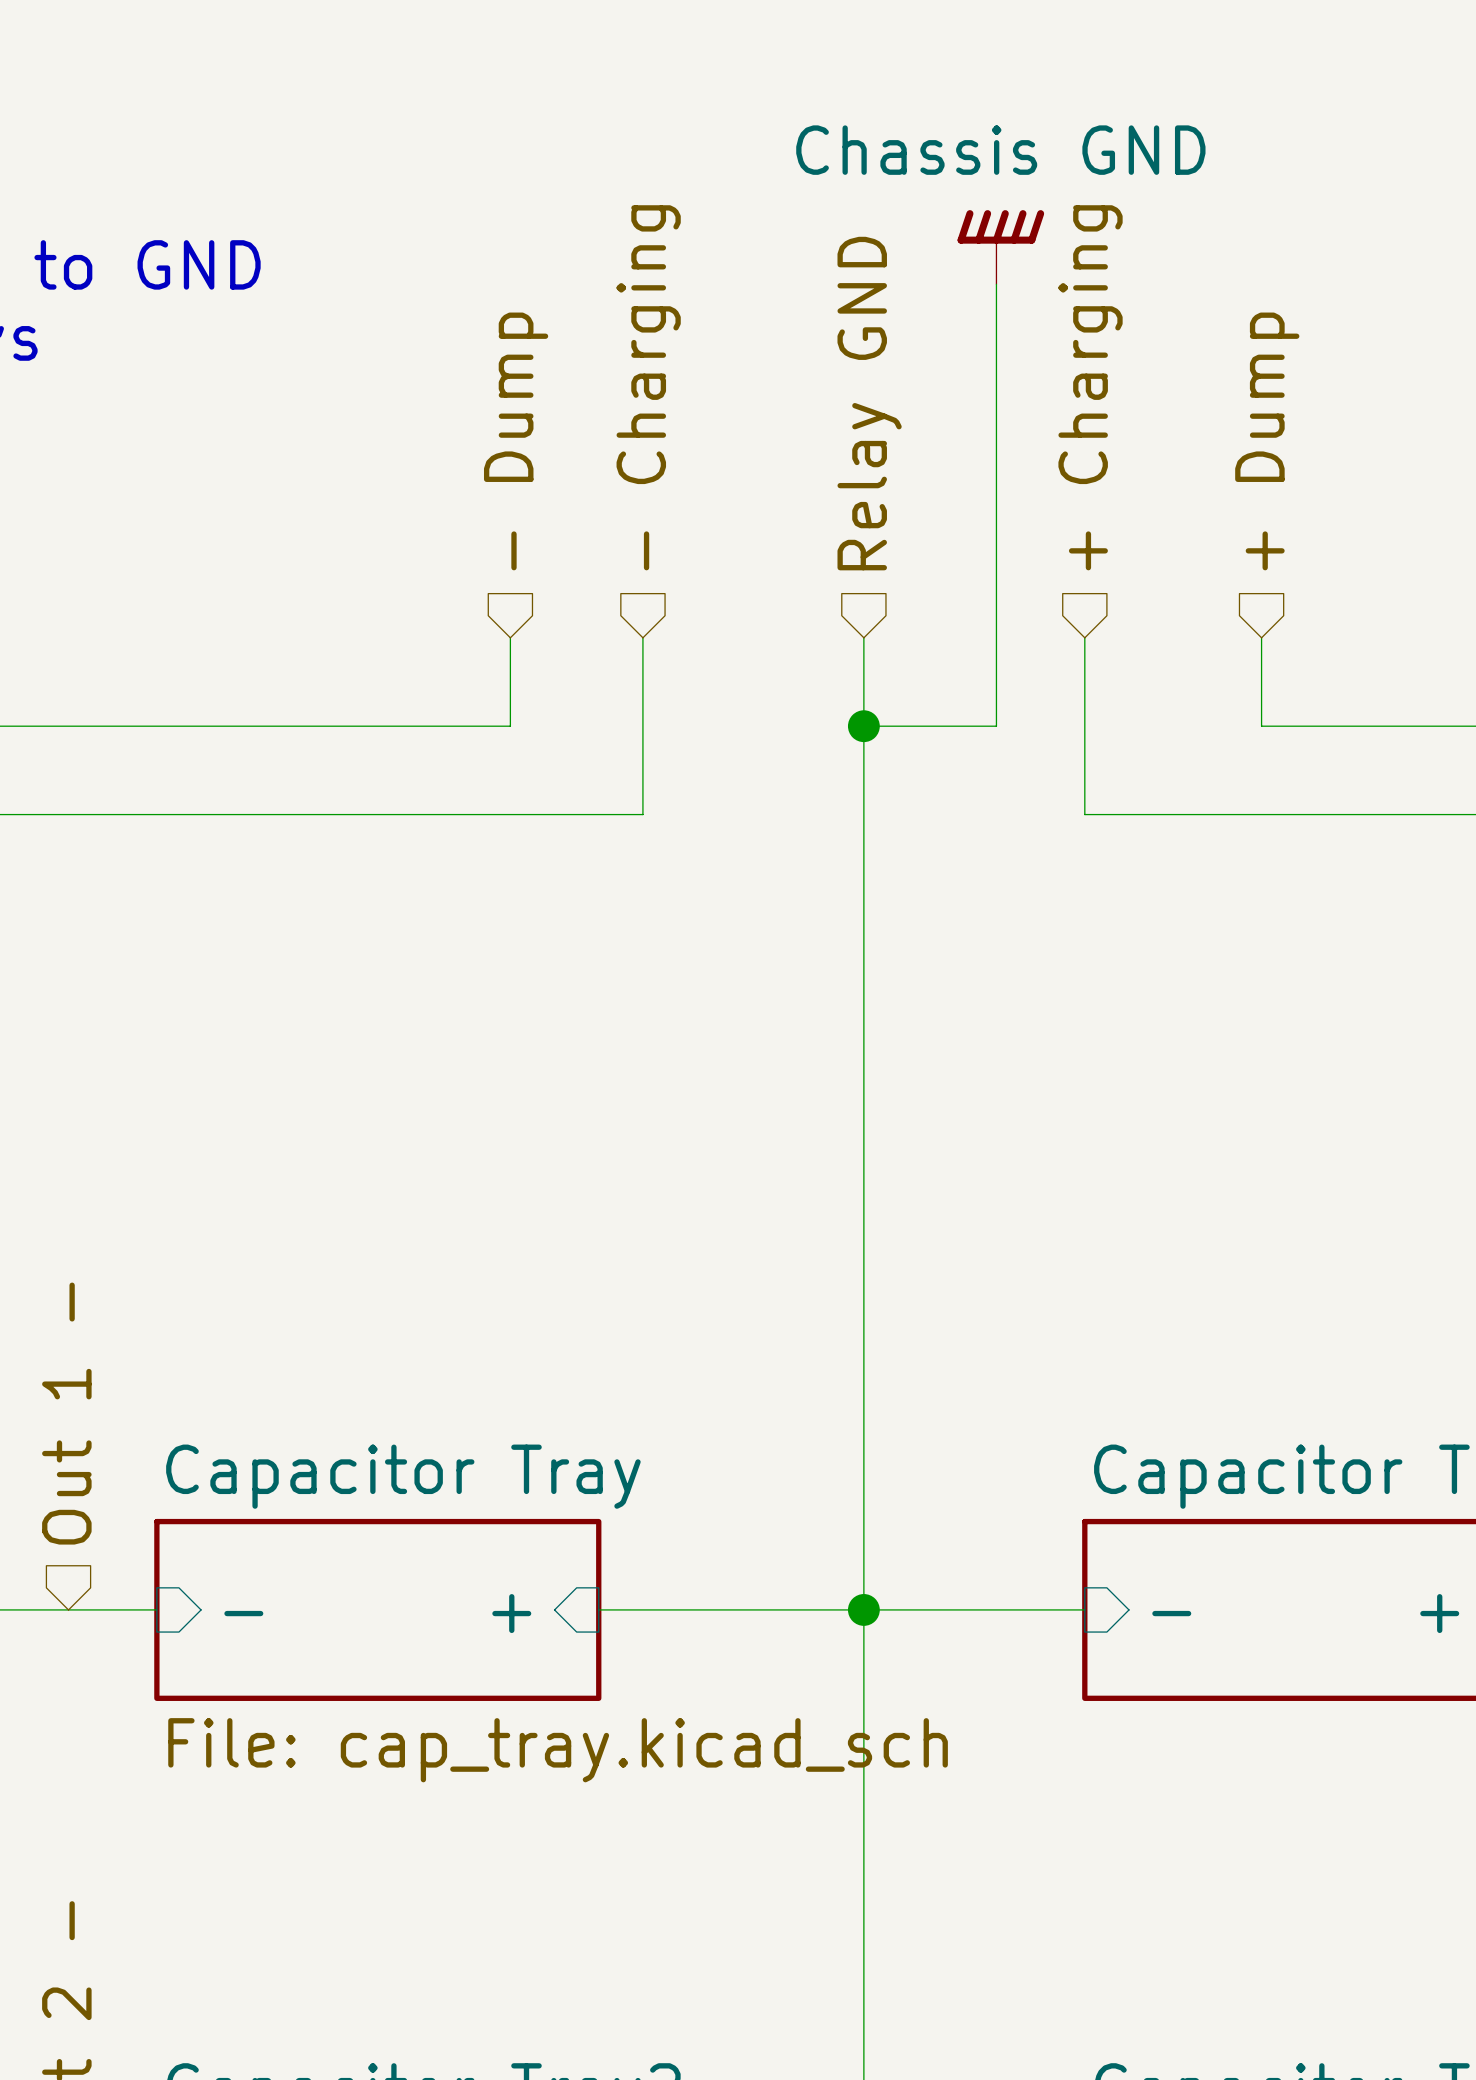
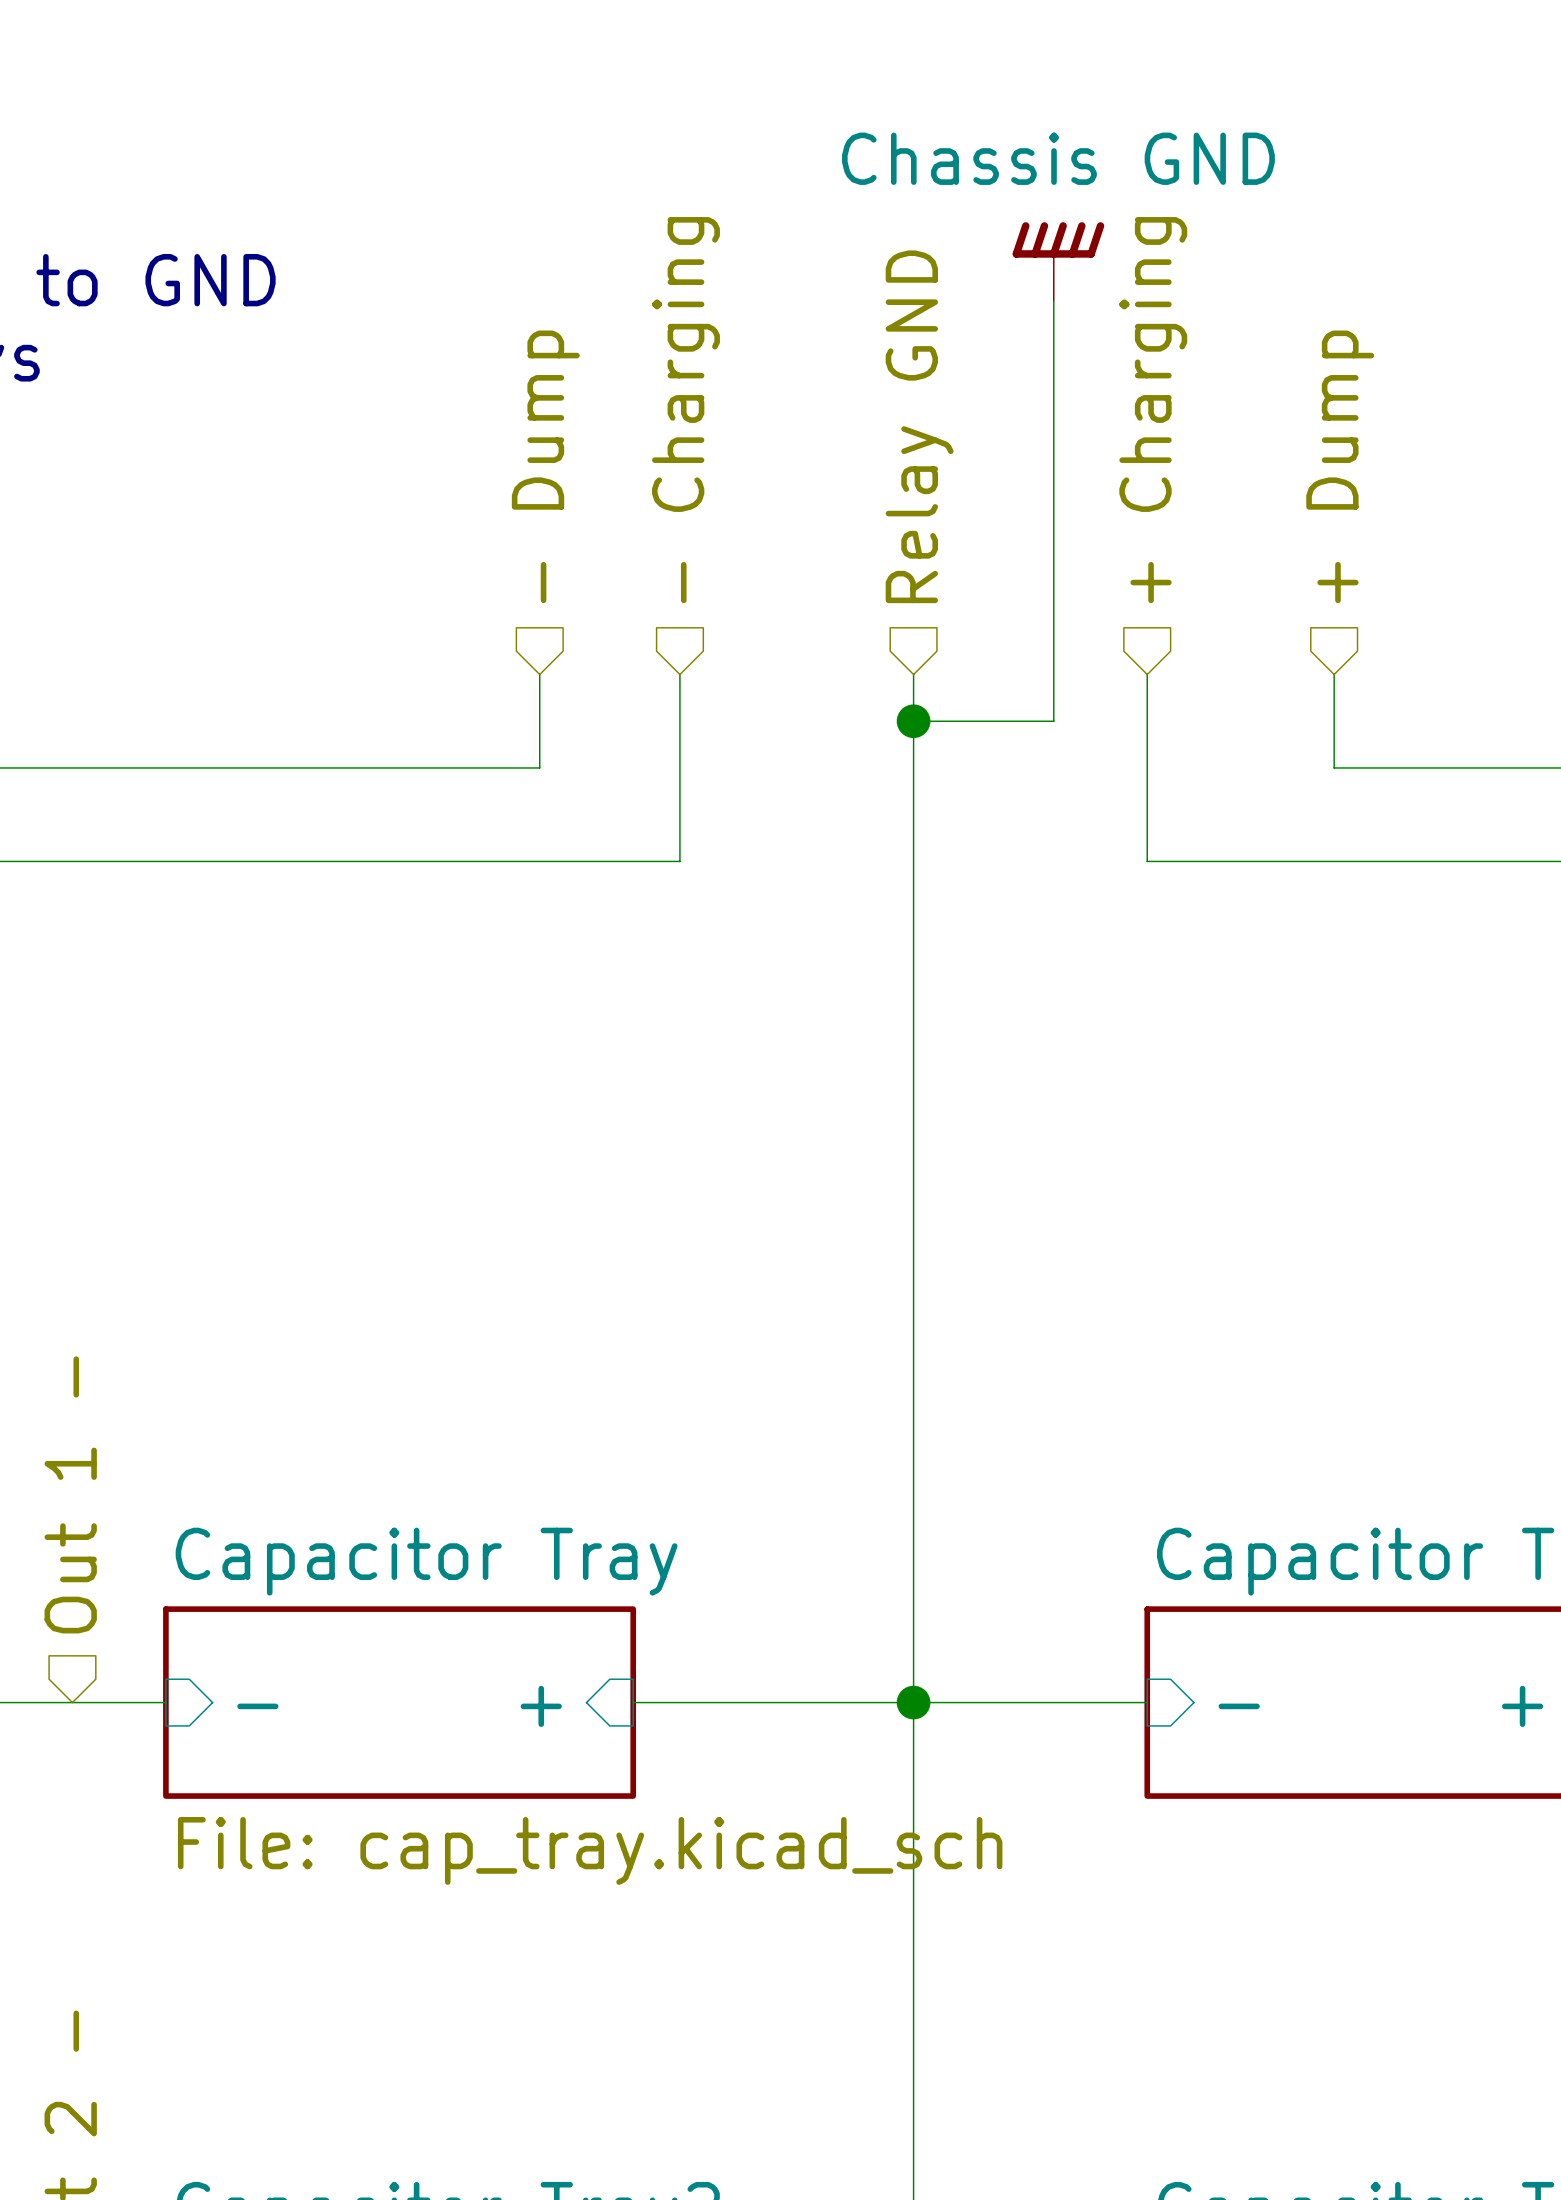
wire: (996, 682) (996, 726) (863, 726) -> (1053, 721) (913, 721)
junction position: (863, 726) -> (913, 721)

